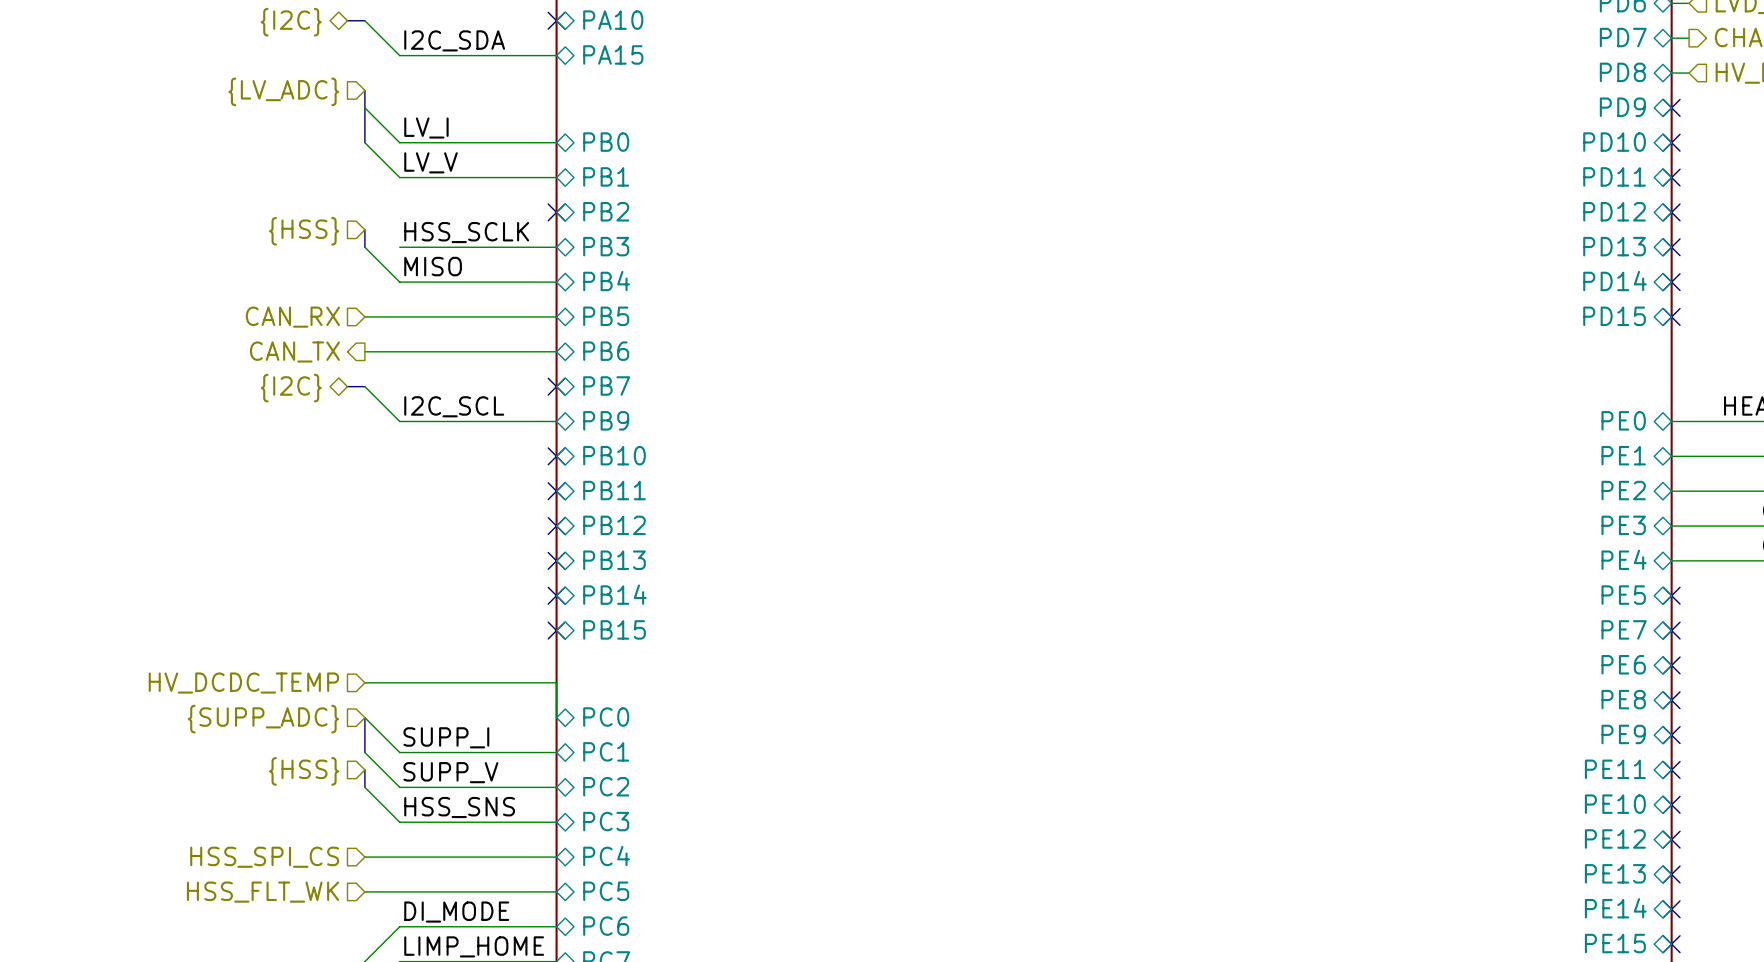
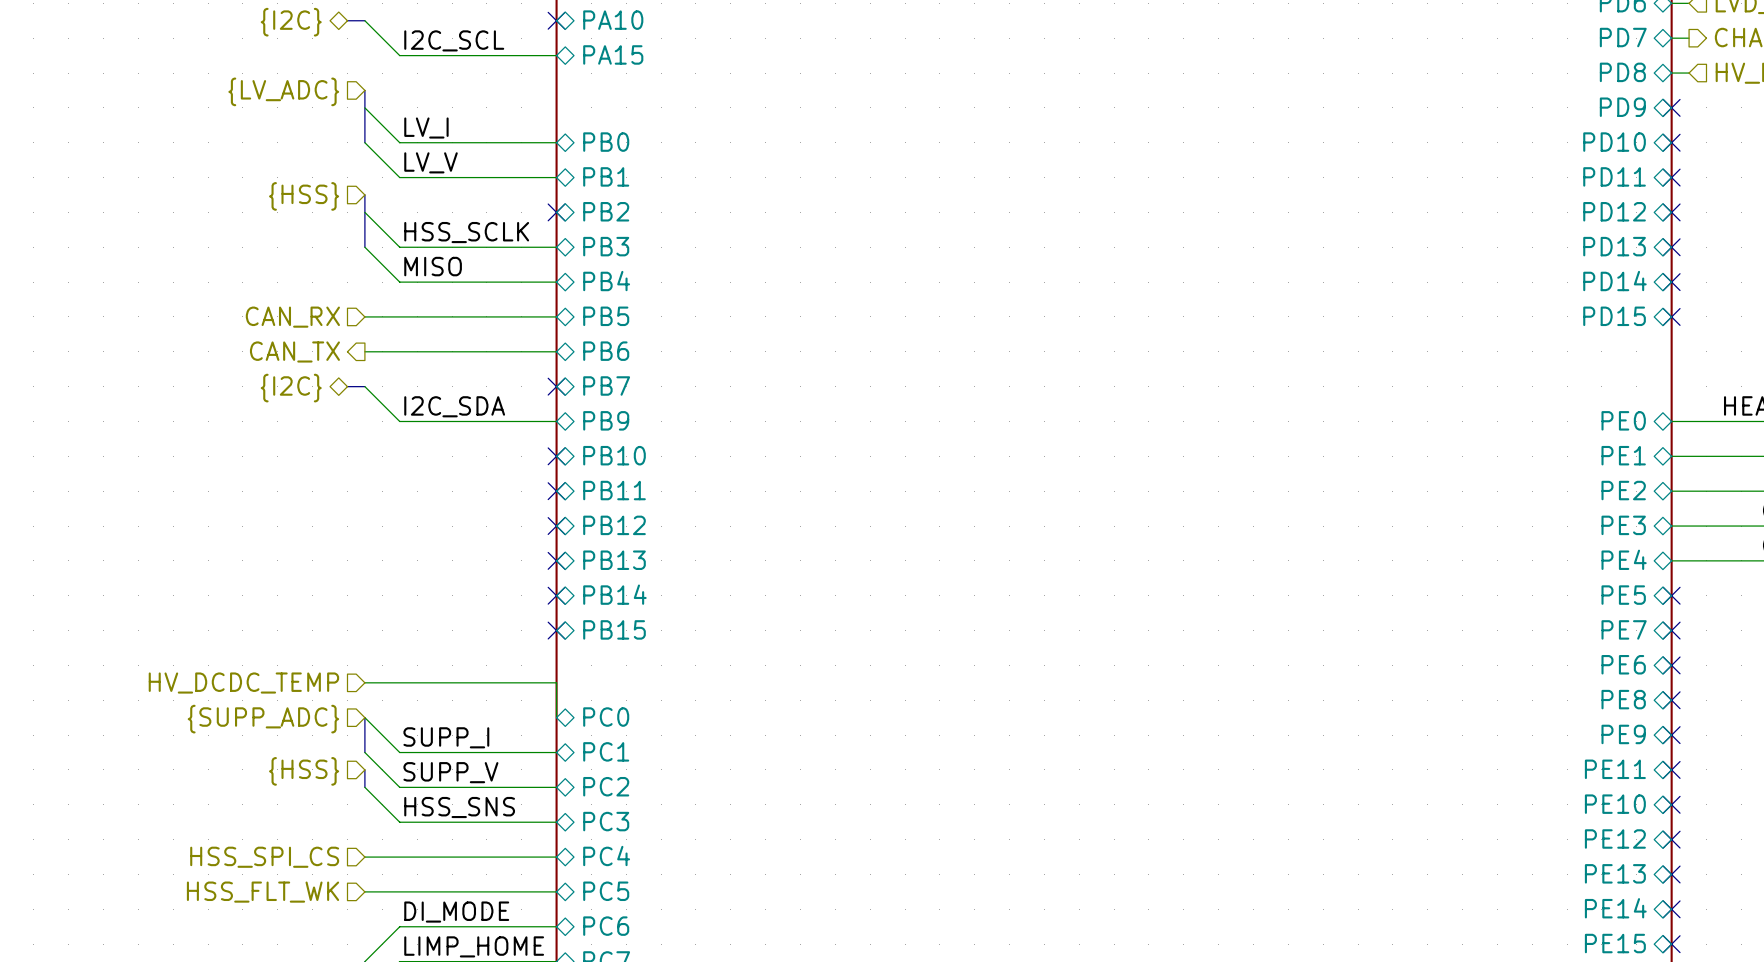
label: I2C_SDA (454, 40) -> I2C_SCL (454, 40)
bus: none -> (364, 194) (364, 229)
wire: none -> (364, 212) (399, 247)
hierarchical label position: {HSS} (304, 231) -> {HSS} (304, 196)
label: I2C_SCL (454, 406) -> I2C_SDA (454, 406)

